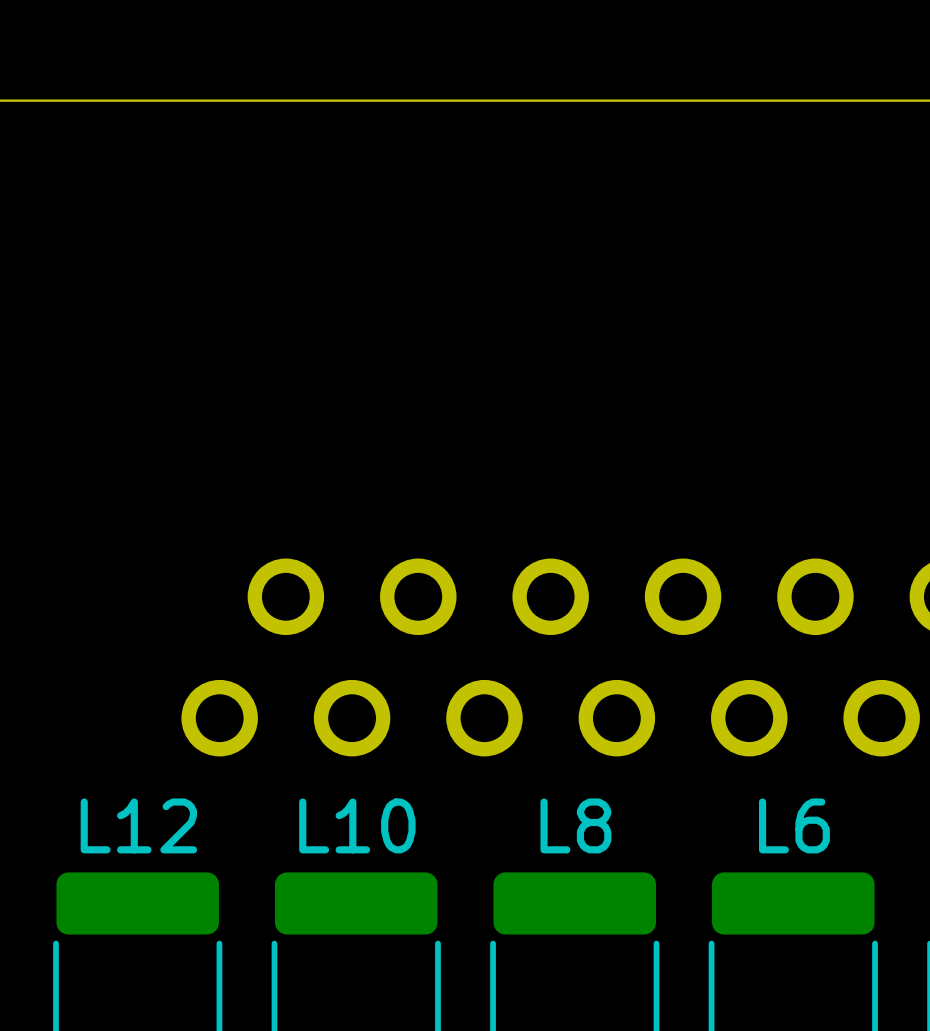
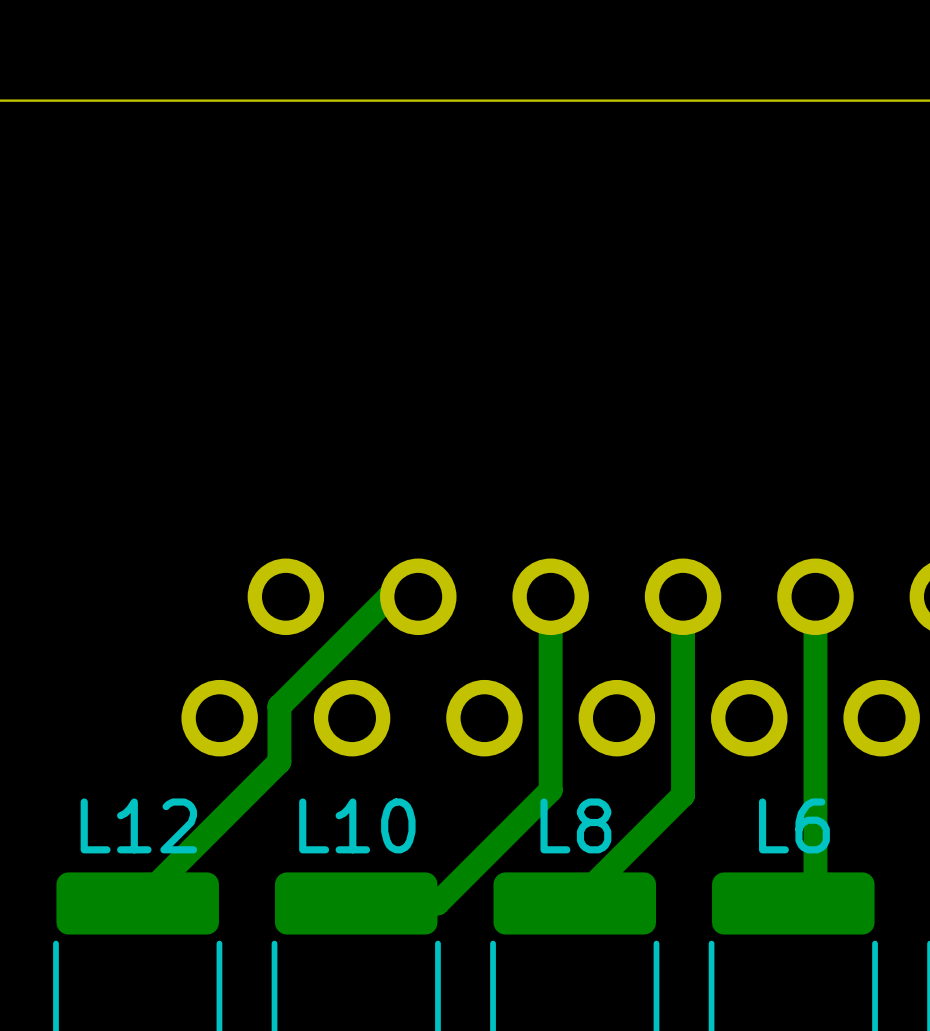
track: none -> (418, 596) (388, 596) (279, 706) (279, 761) (137, 903)
track: none -> (550, 596) (550, 790) (437, 903) (356, 903)
track: none -> (683, 596) (683, 795) (574, 903)
track: none -> (815, 596) (815, 881) (793, 903)

